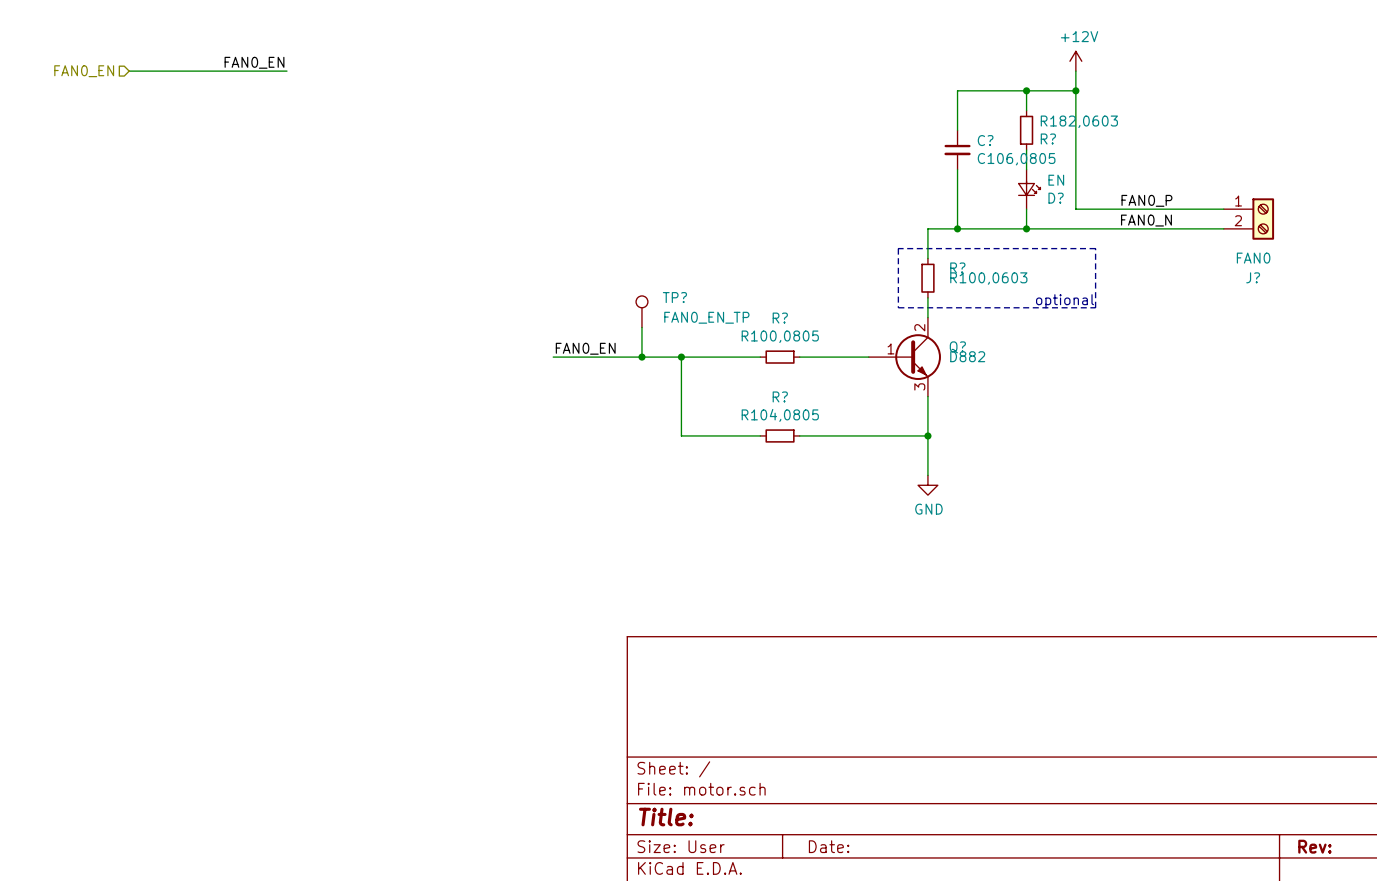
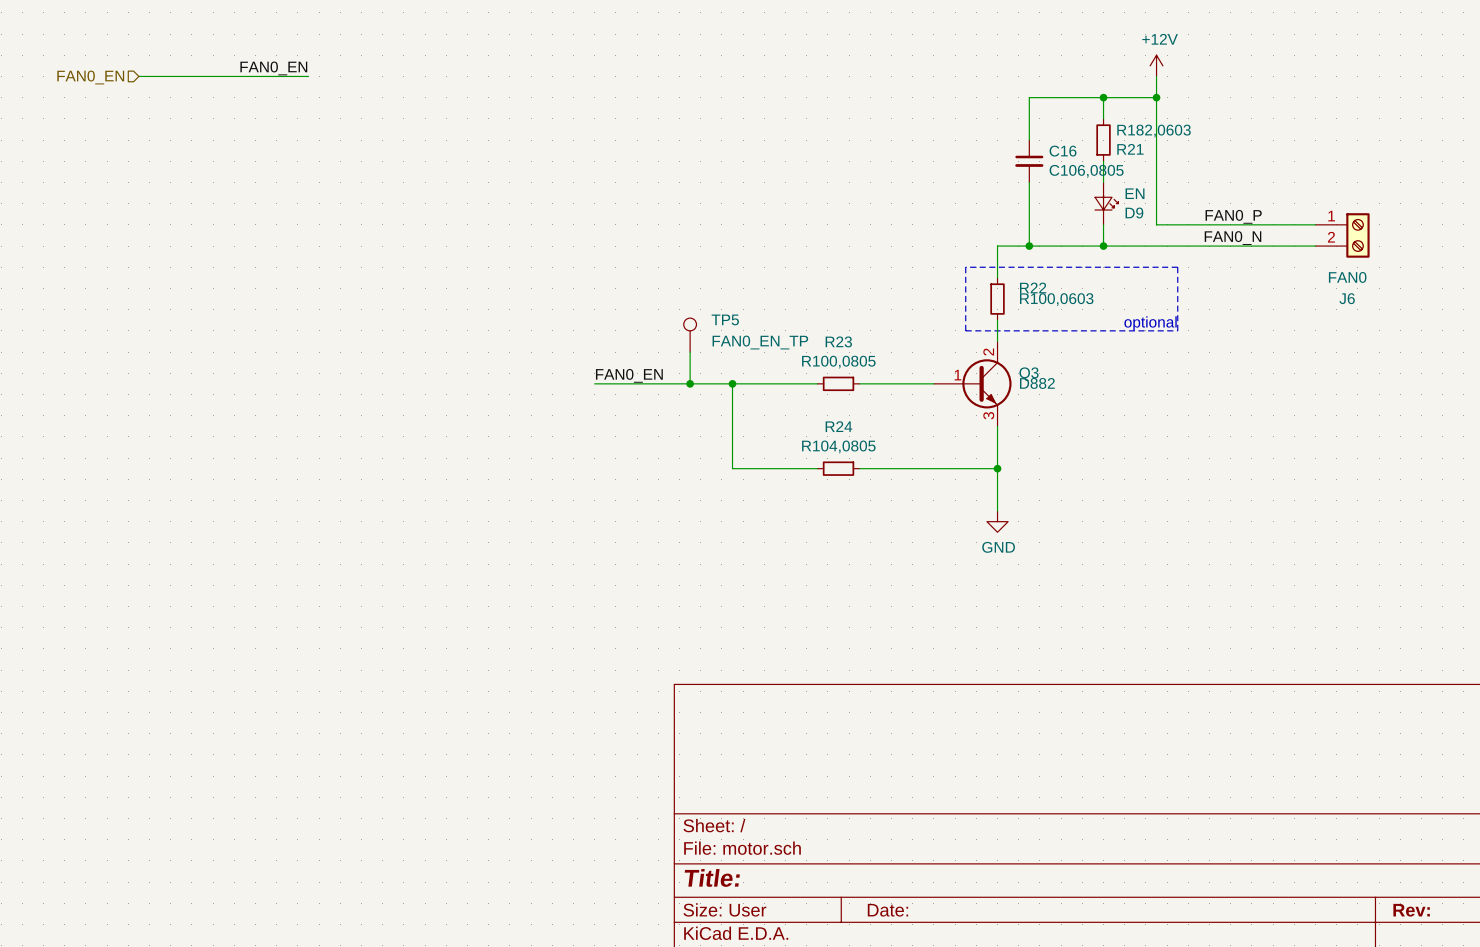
R? name: R? (1048, 138) -> R21 (1130, 149)
C? name: C? (985, 140) -> C16 (1063, 151)
D? name: D? (1056, 198) -> D9 (1134, 213)
R? name: R? (957, 267) -> R22 (1033, 287)
J? name: J? (1253, 277) -> J6 (1347, 298)
TP? name: TP? (674, 297) -> TP5 (725, 319)
R? name: R? (780, 318) -> R23 (838, 341)
Q? name: Q? (957, 347) -> Q3 (1029, 374)
R? name: R? (780, 396) -> R24 (838, 426)

